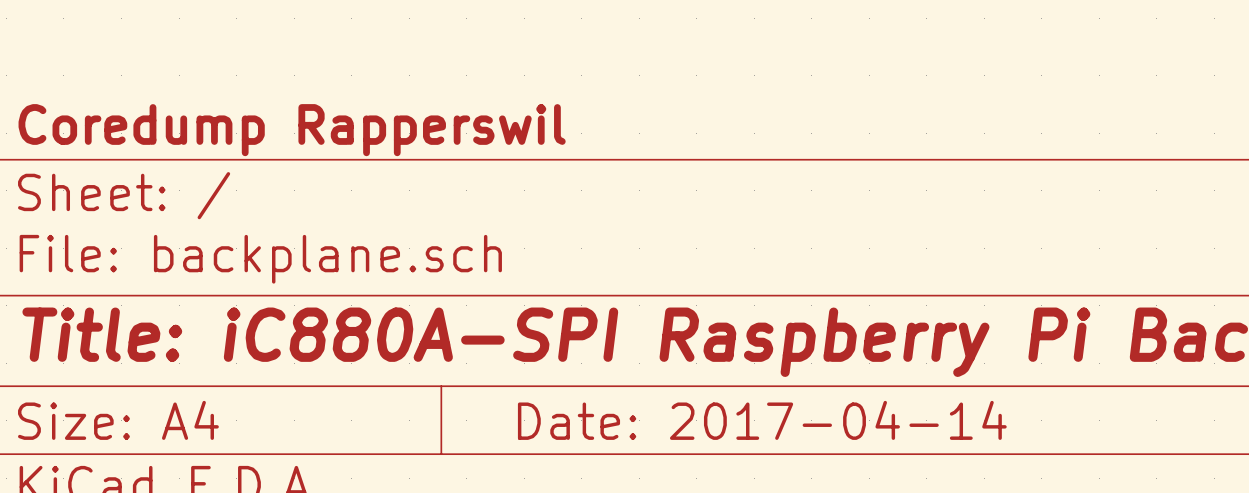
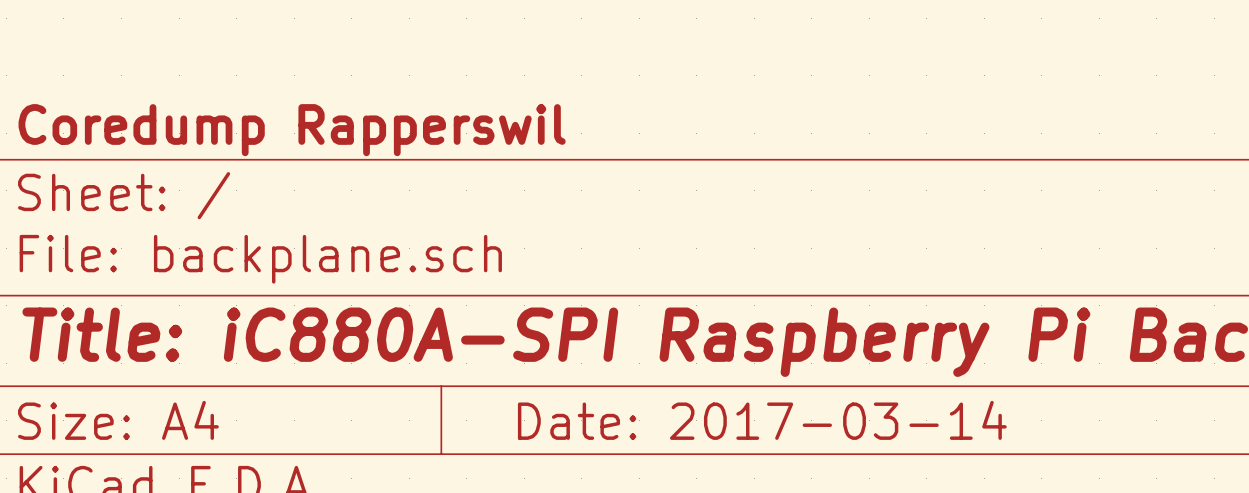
title block: Date: 2017-04-14 (762, 420) -> Date: 2017-03-14 (762, 420)

